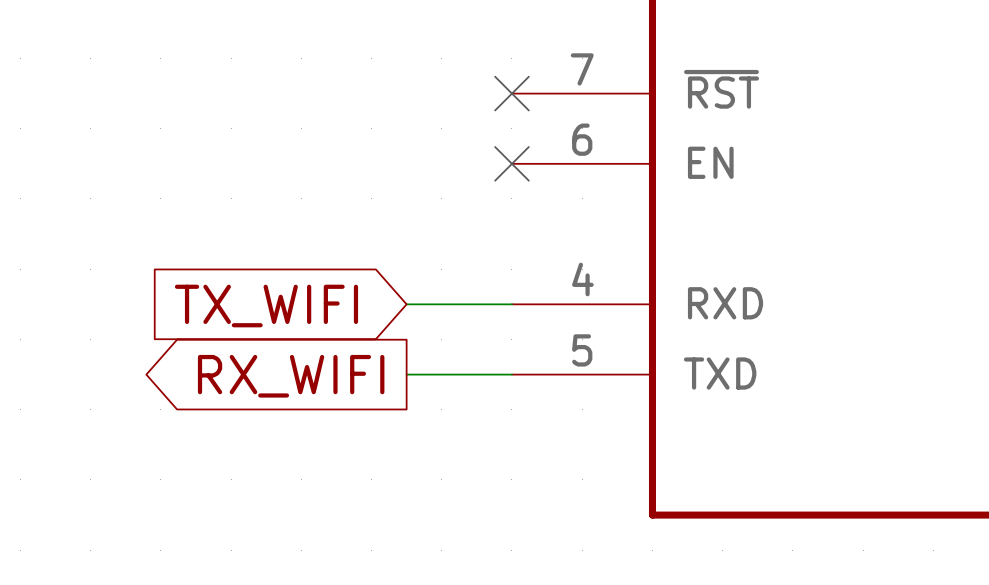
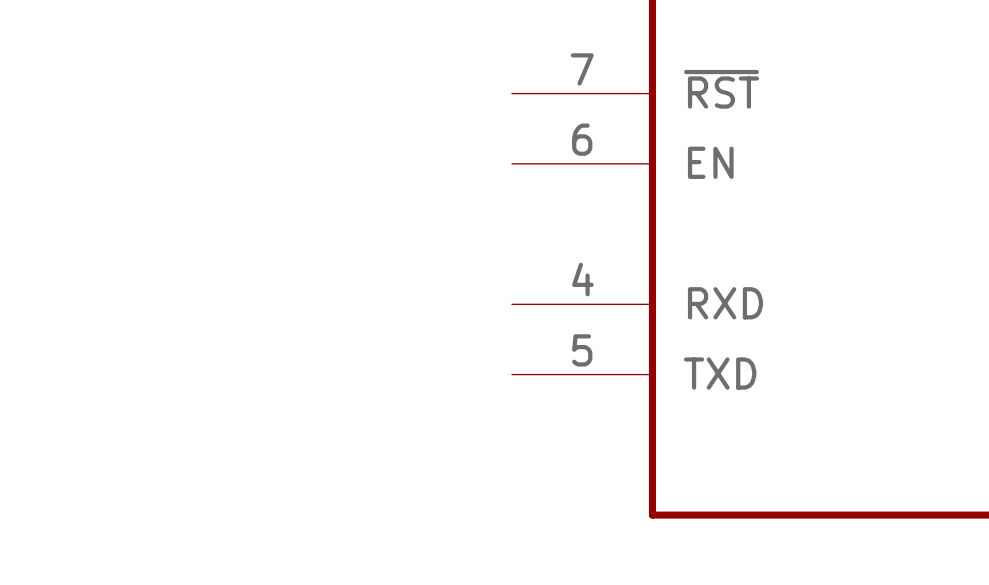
no-connect mark: (511, 93) -> none
no-connect mark: (511, 163) -> none
wire: (406, 304) (511, 304) -> none
global label: TX_WIFI (266, 306) -> none
wire: (406, 374) (511, 374) -> none
global label: RX_WIFI (291, 376) -> none

